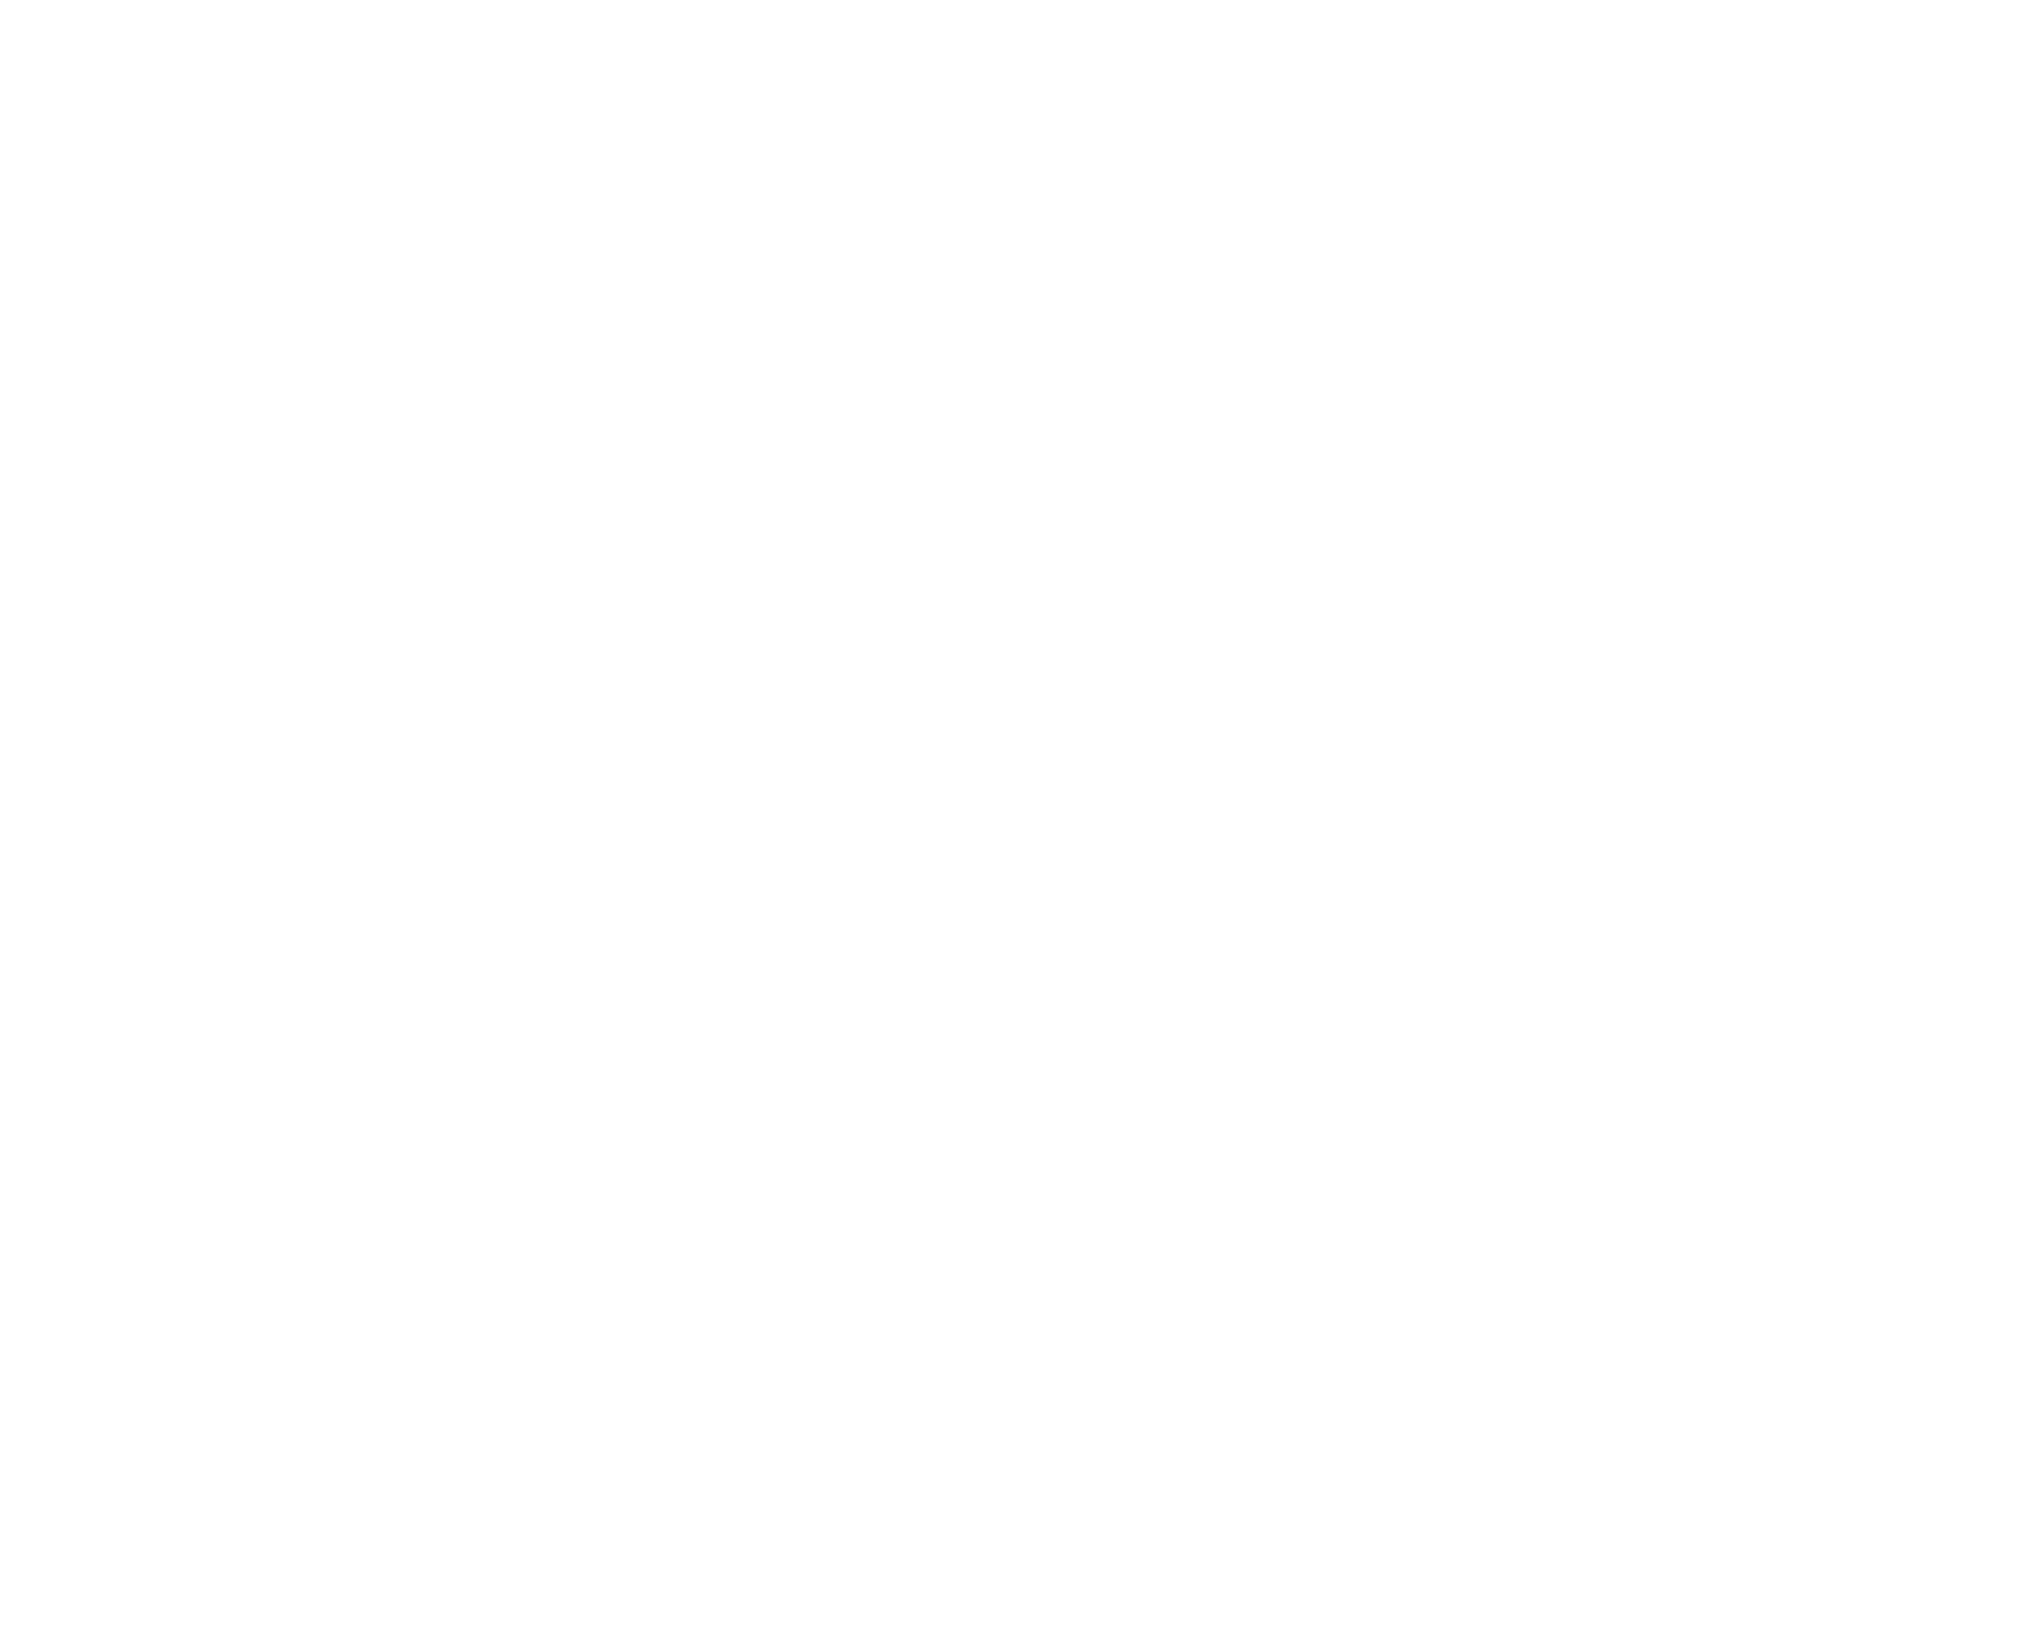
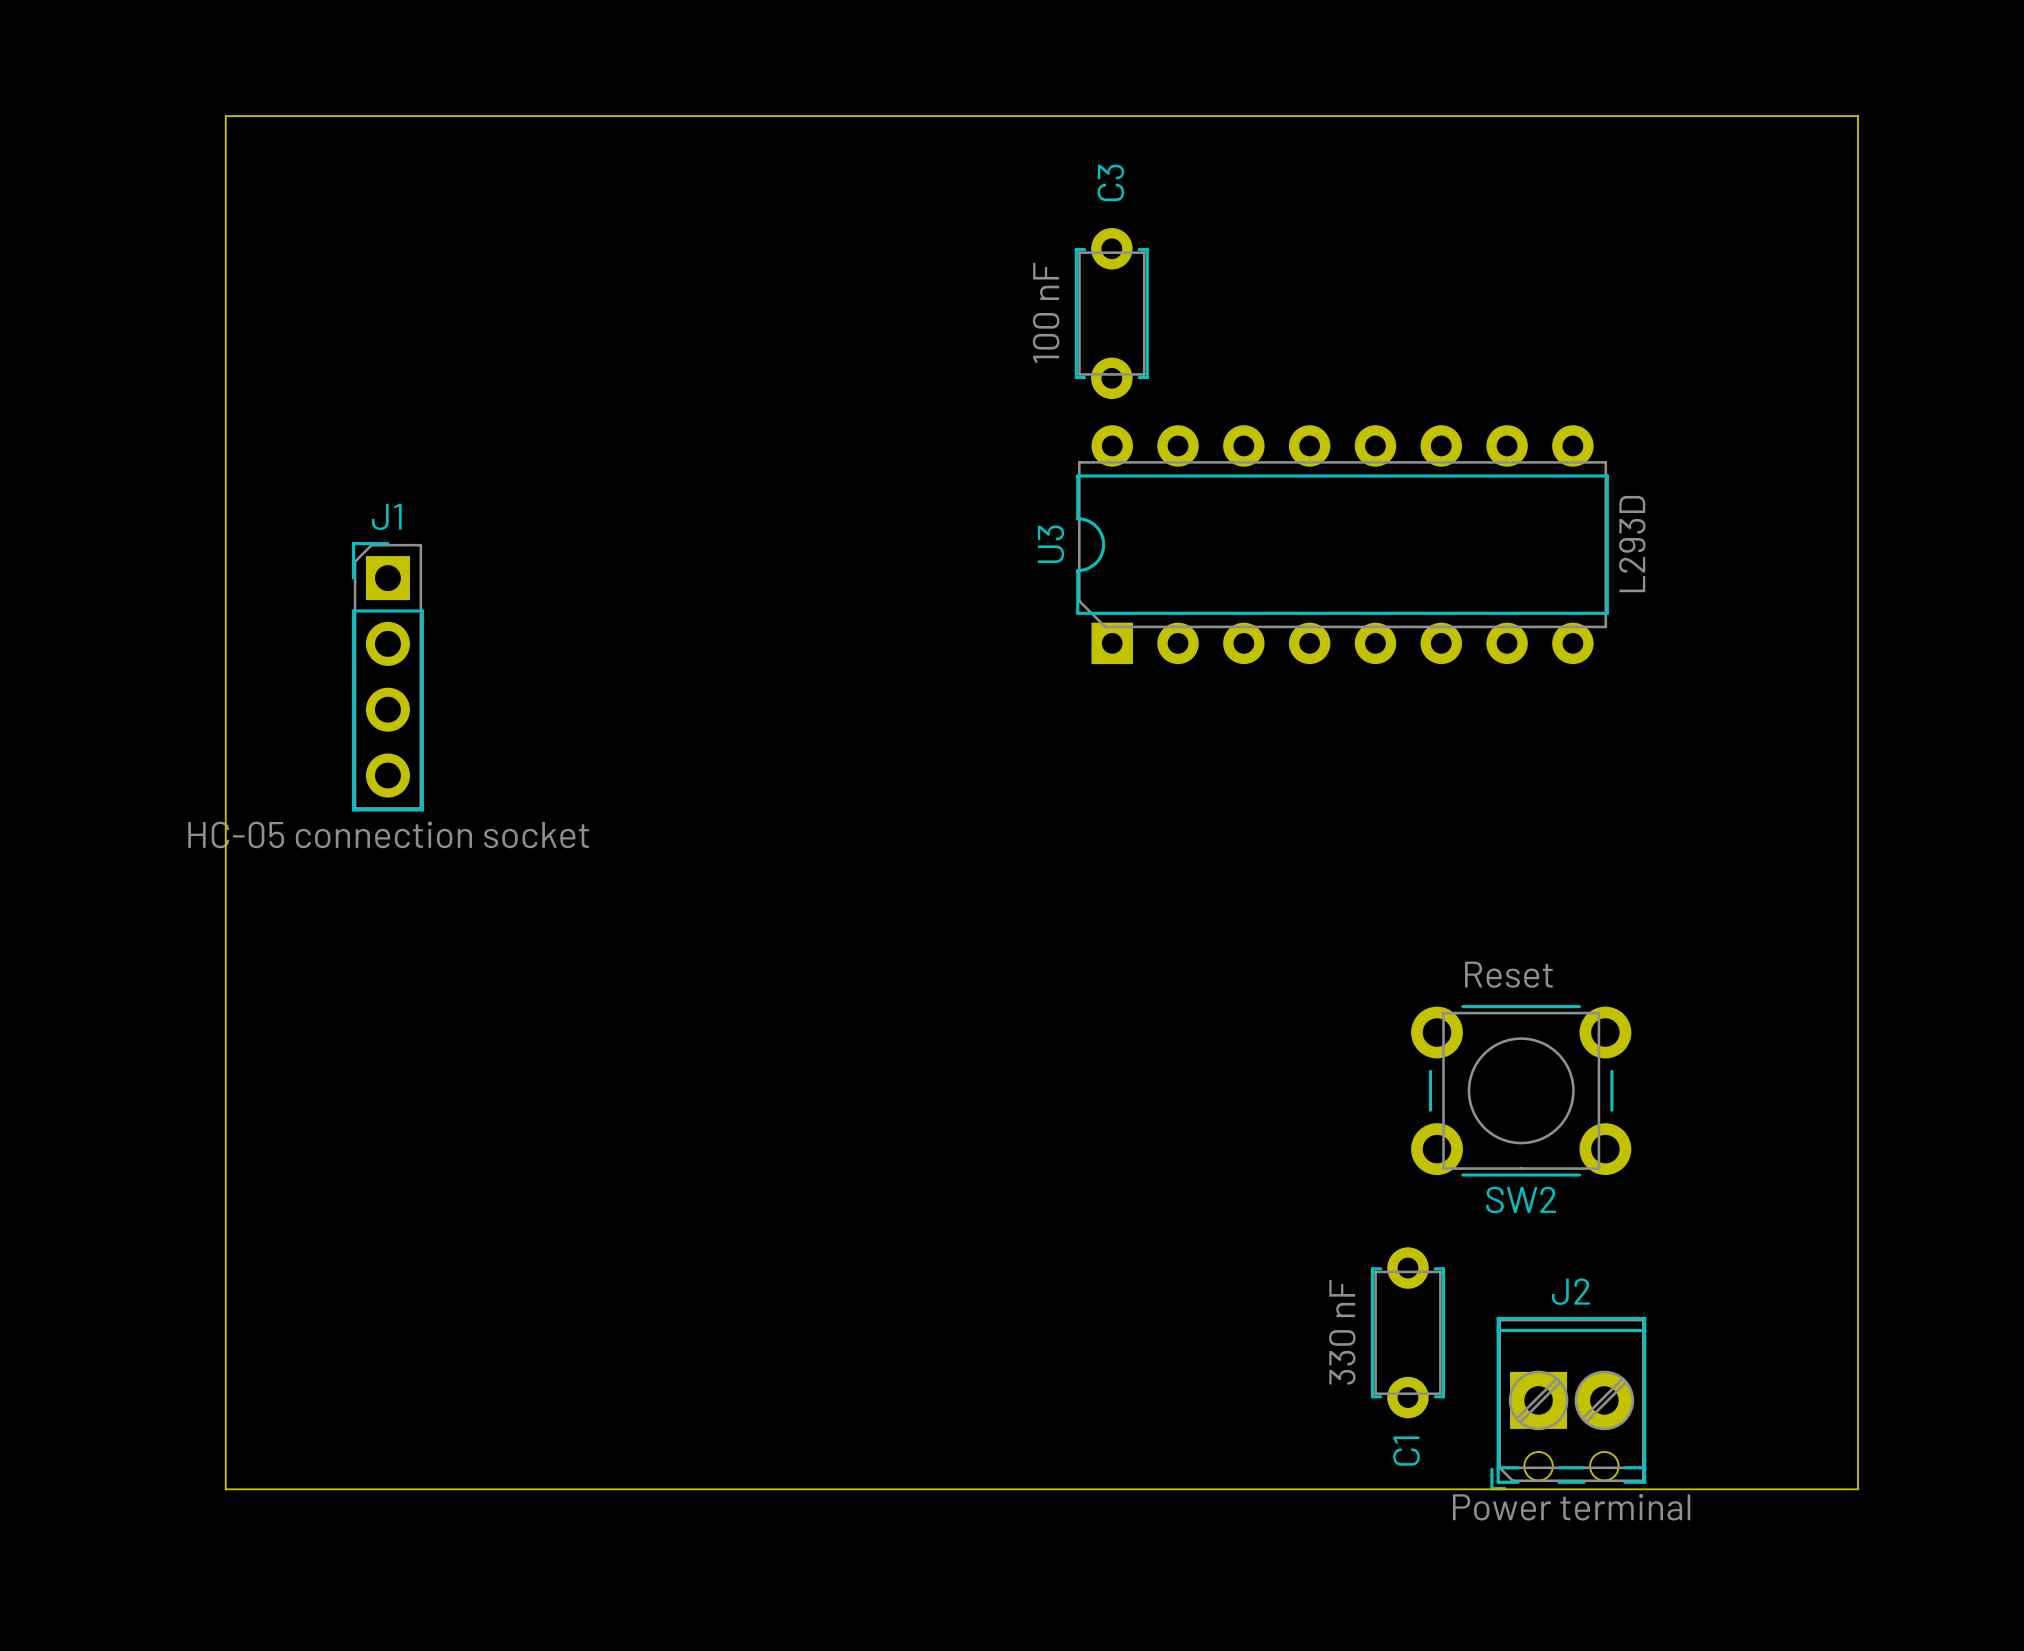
board edge: none -> (225, 116) (1858, 116) (1858, 1489) (225, 1489) (225, 116)
C3: none -> 100 nF (1111, 313)
U3: none -> L293D (1342, 544)
J1: none -> HC-05 connection socket (387, 676)
SW2: none -> Reset (1521, 1090)
C1: none -> 330 nF (1407, 1332)
J2: none -> Power terminal (1568, 1403)

